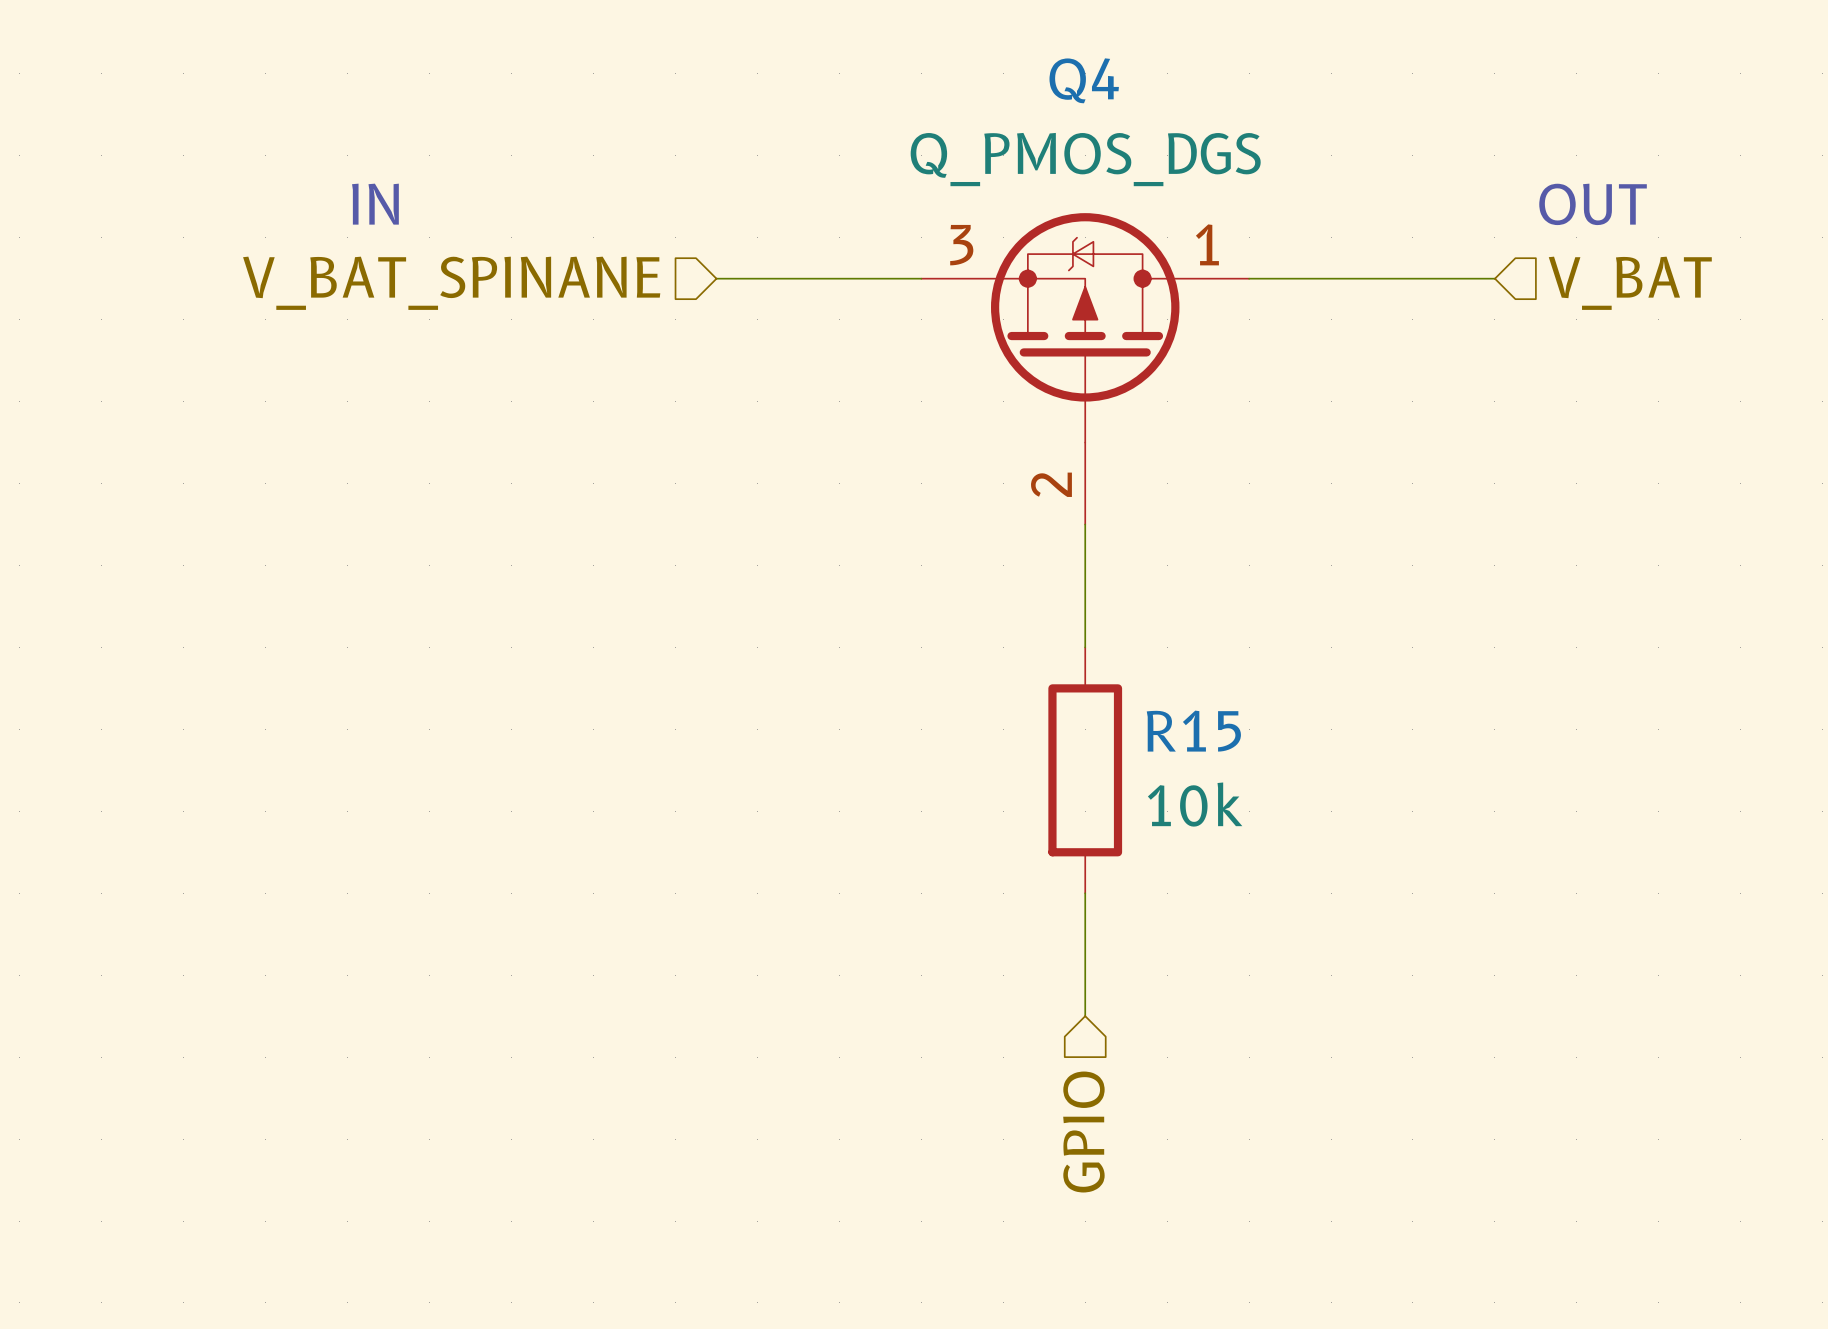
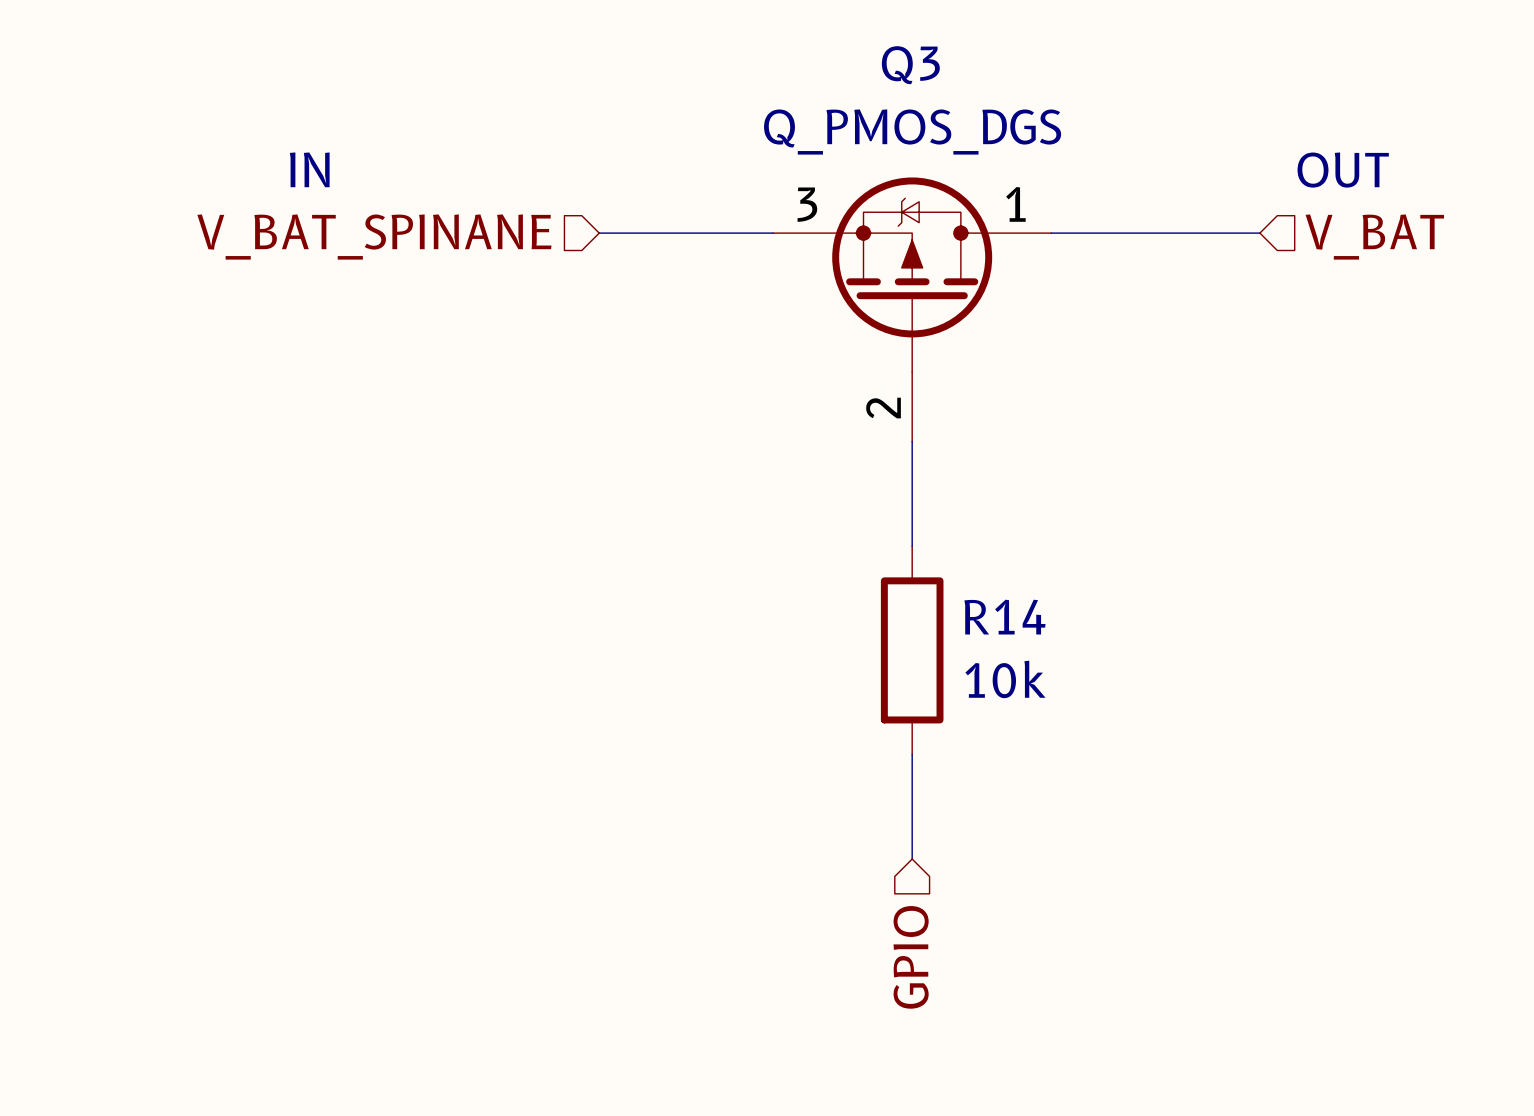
Q4 name: Q4 (1084, 80) -> Q3 (910, 65)
R15 name: R15 (1193, 731) -> R14 (1004, 617)

